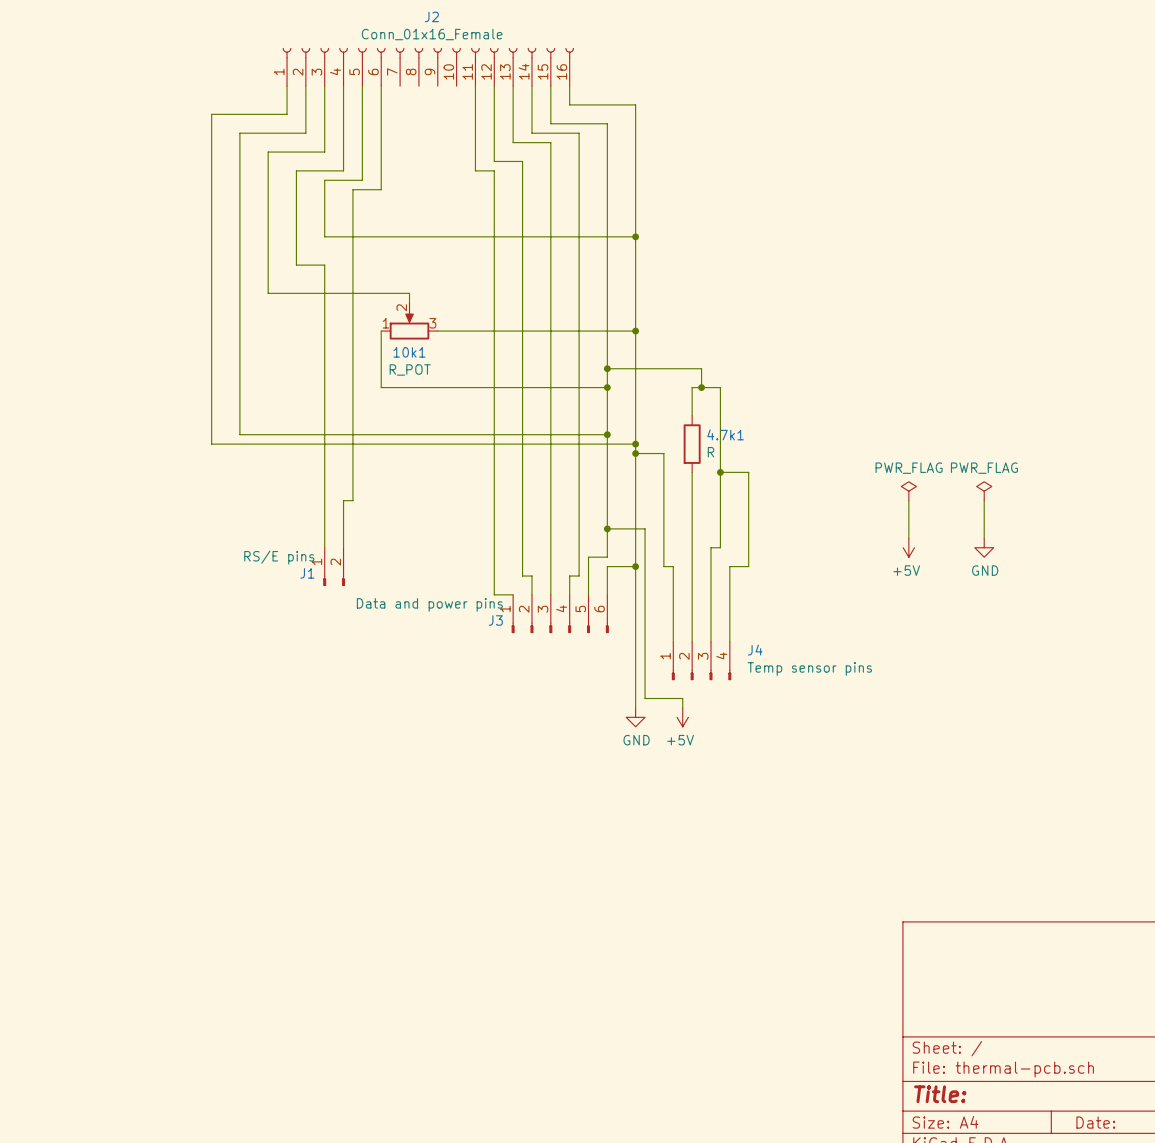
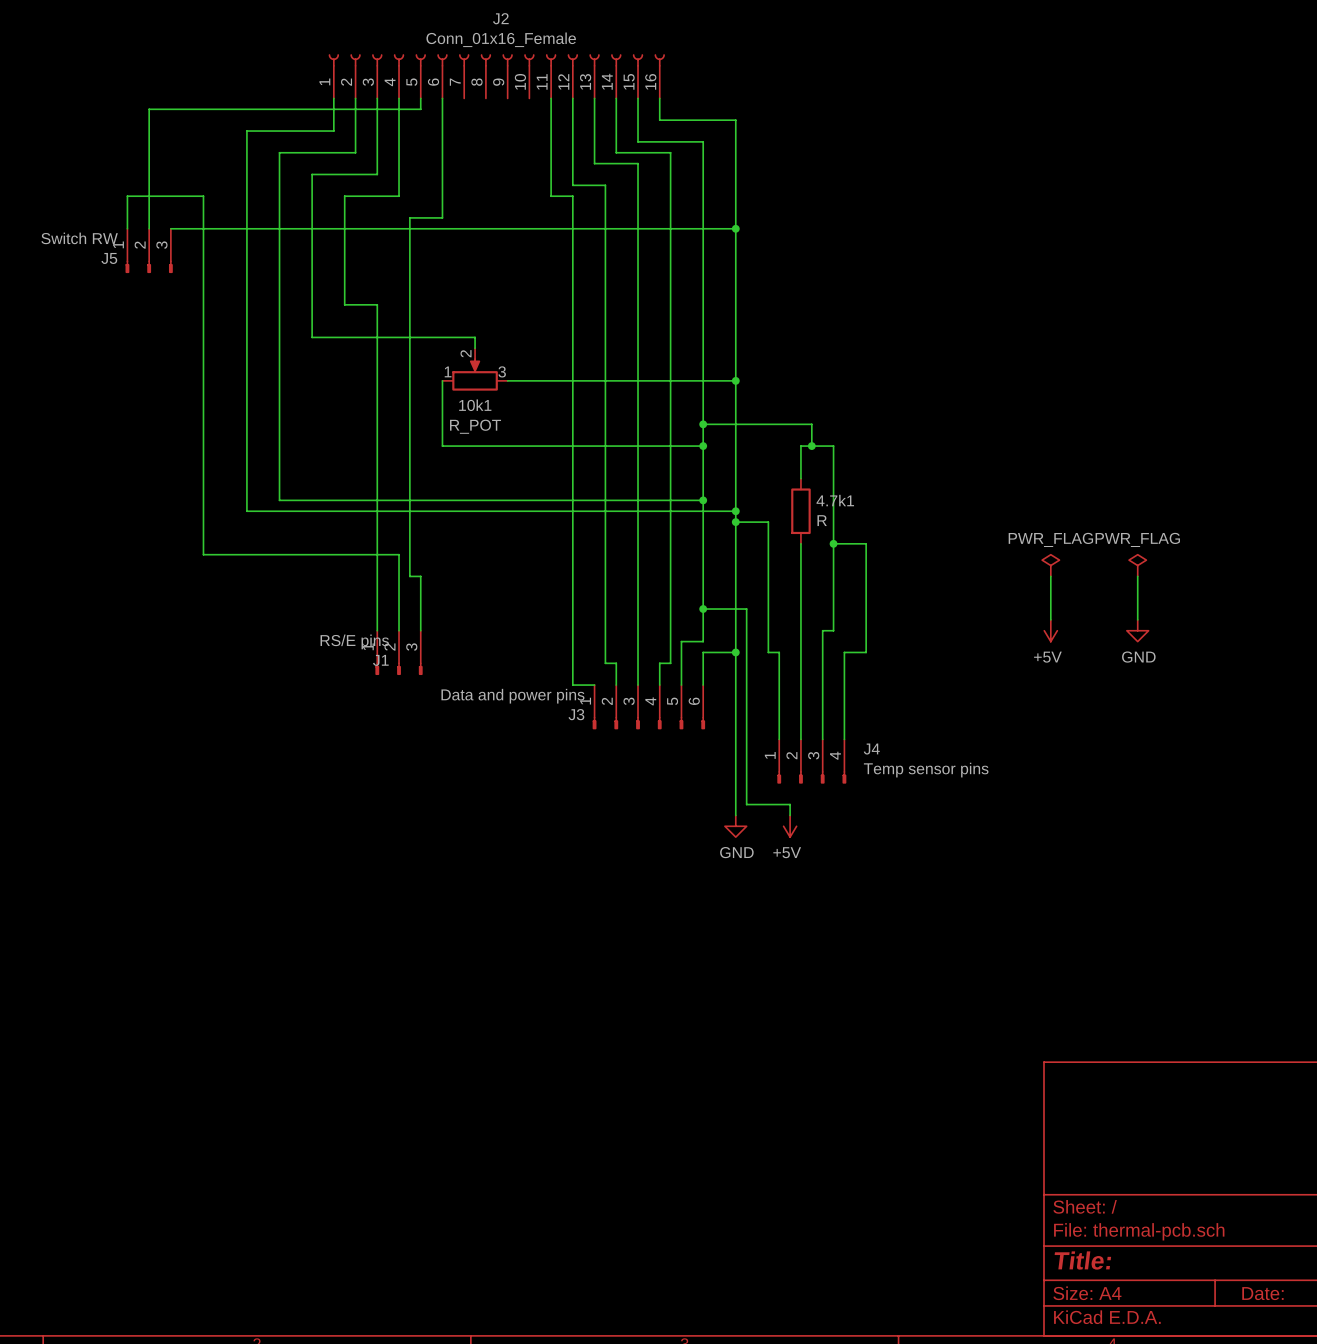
wire: (362, 95) (362, 180) (324, 180) (324, 236) (635, 236) -> (420, 109) (149, 109) (149, 228)
wire: none -> (127, 228) (127, 196) (203, 196) (203, 554) (399, 554) (399, 576)
wire: none -> (170, 228) (735, 228)
J5: none -> Switch RW (149, 250)
junction position: (635, 236) -> (735, 228)
wire: (343, 500) (352, 500) -> (420, 630) (420, 576) (409, 576)
J1 symbol: [323, 547, 346, 587] -> [375, 630, 423, 675]

